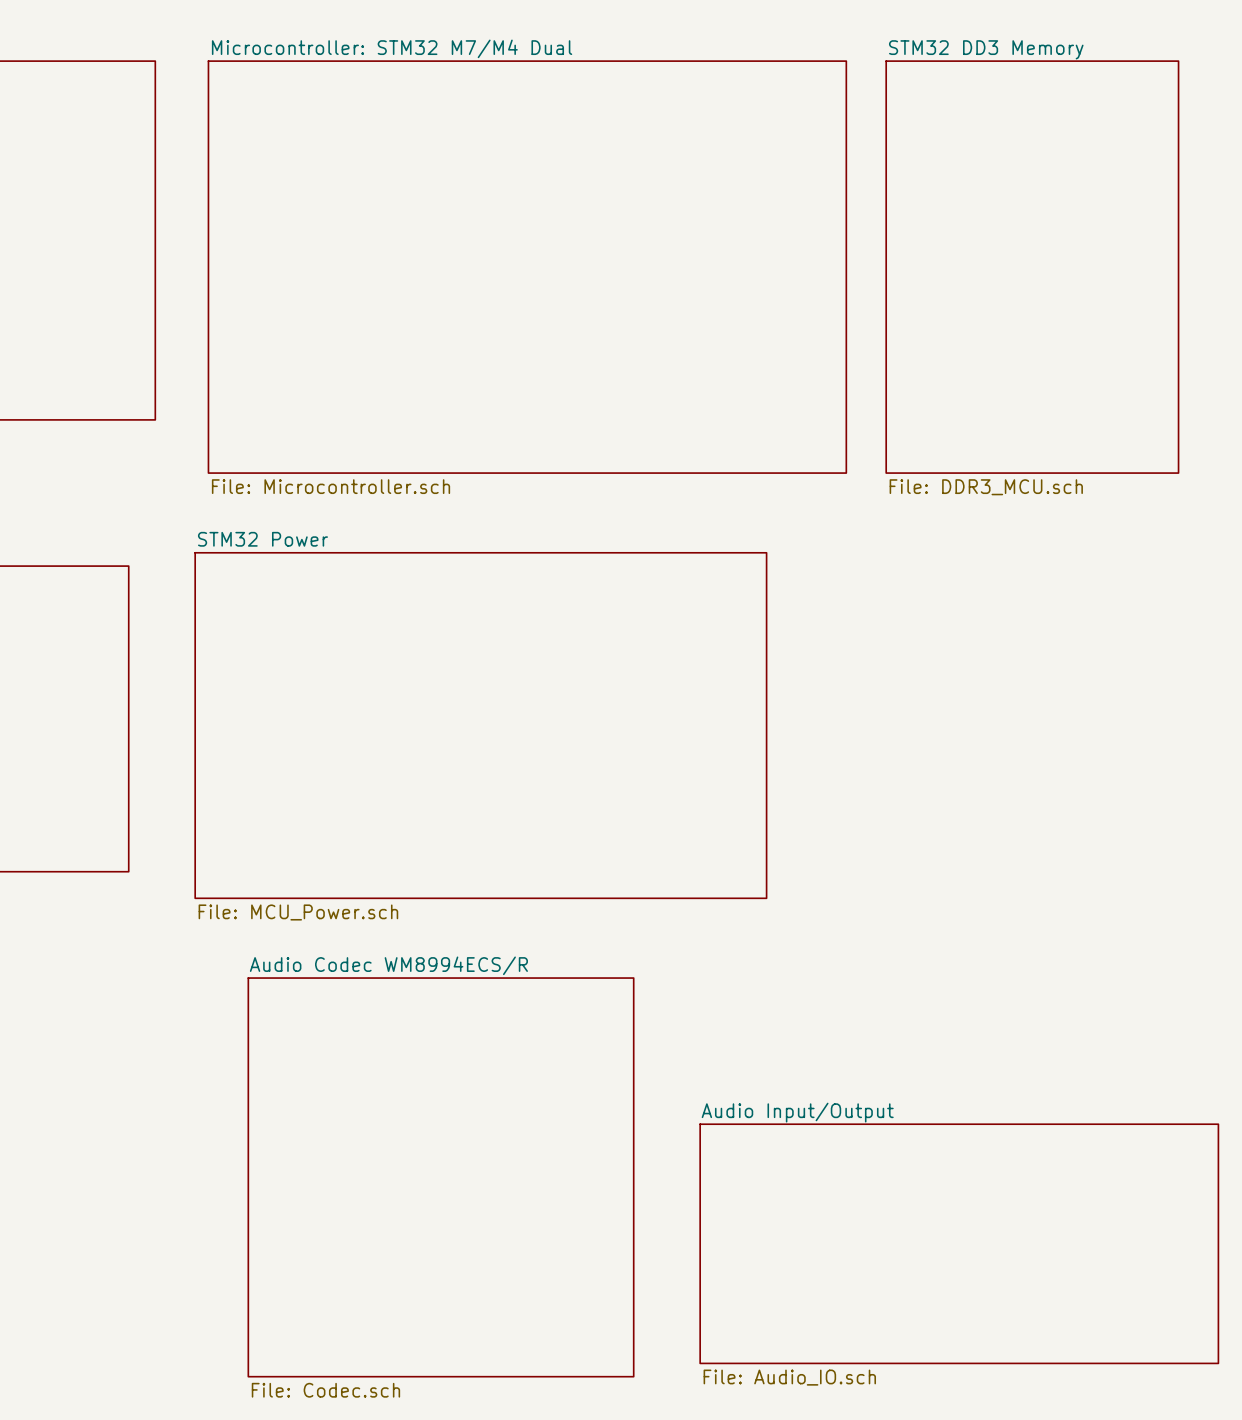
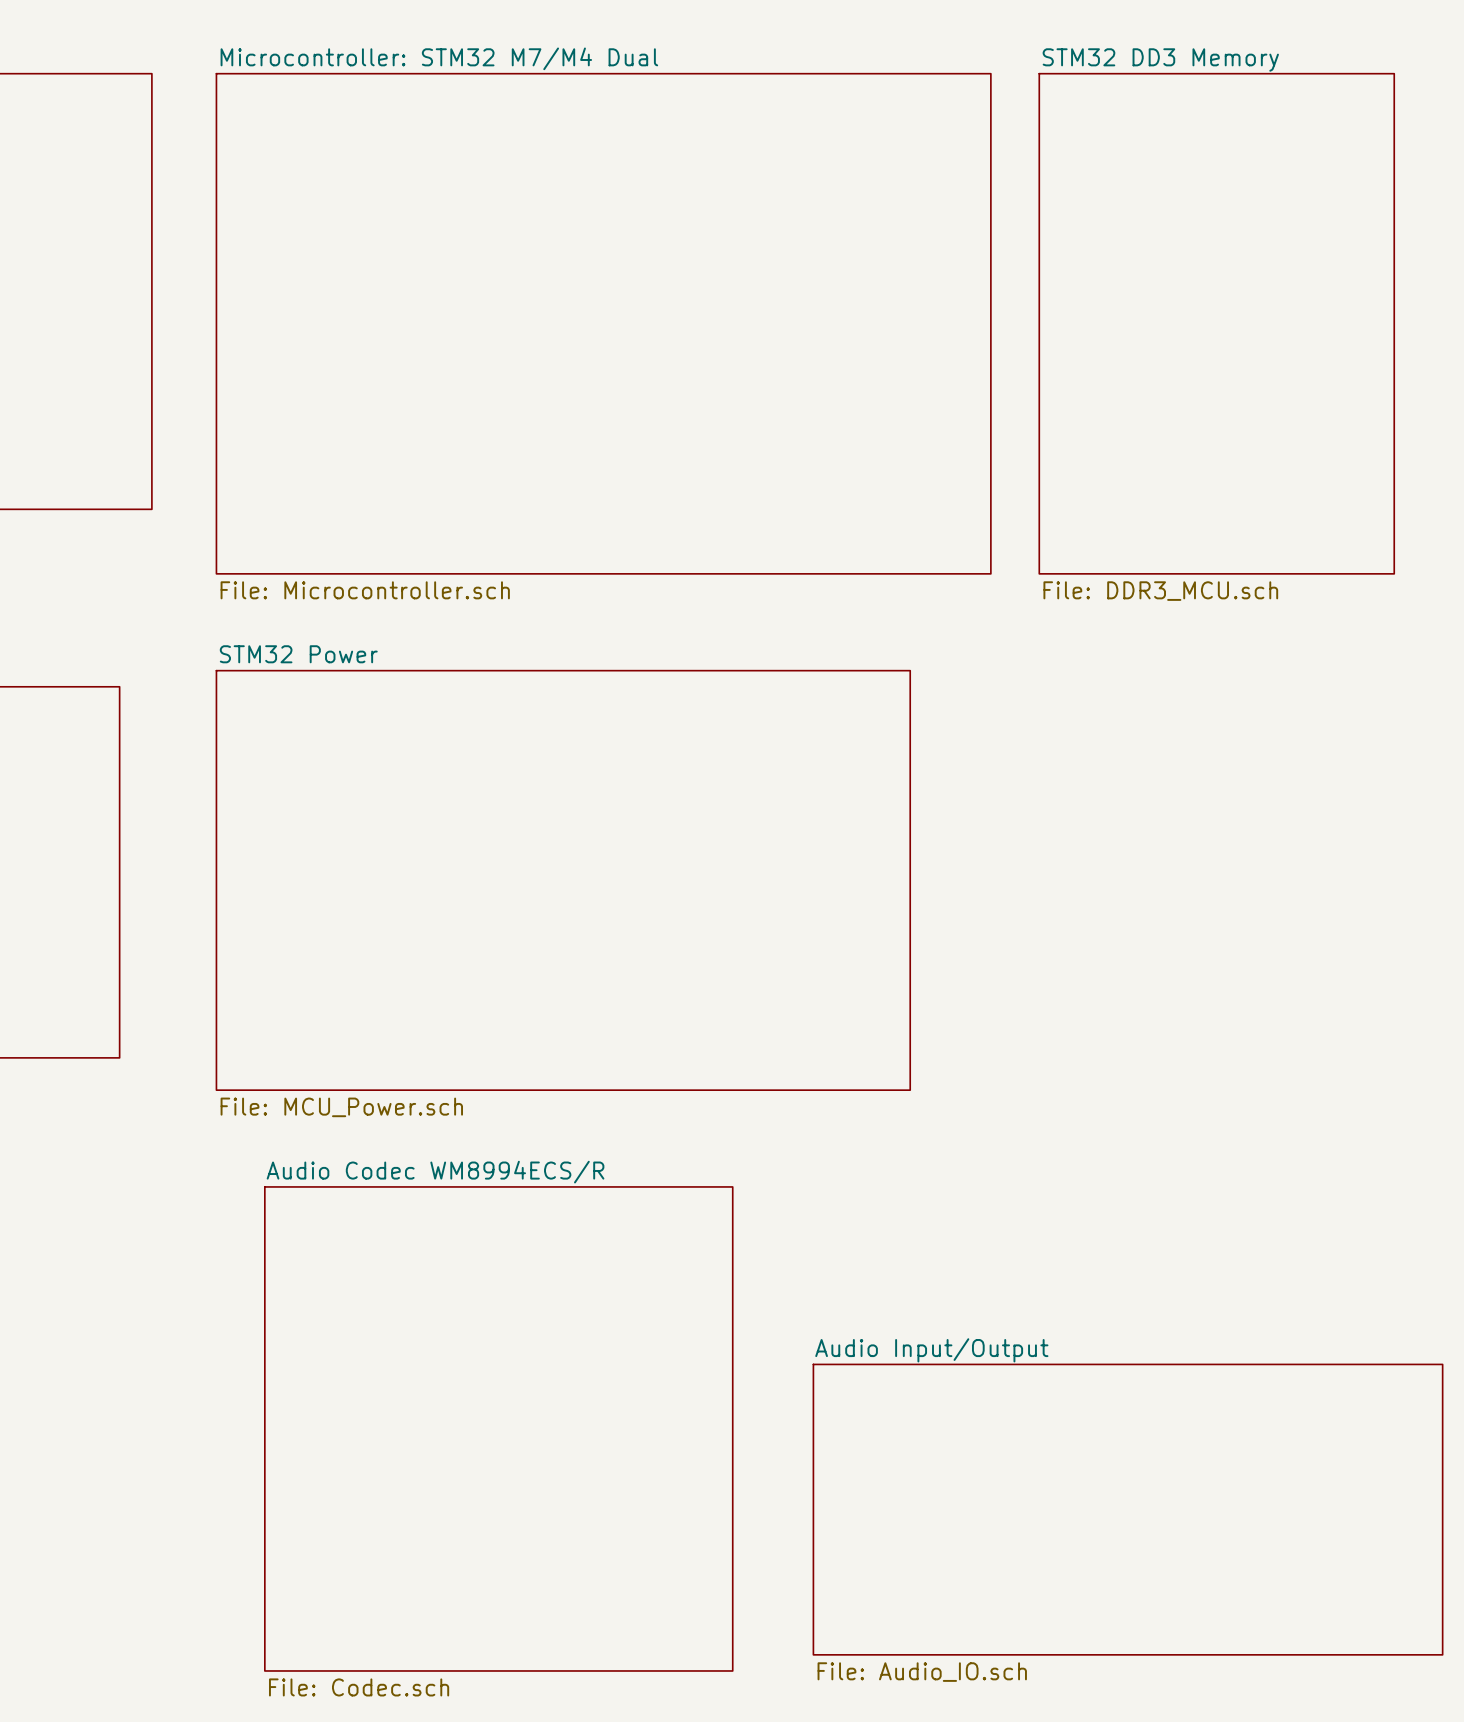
sheet STM32 Power position: (480, 725) -> (563, 880)

